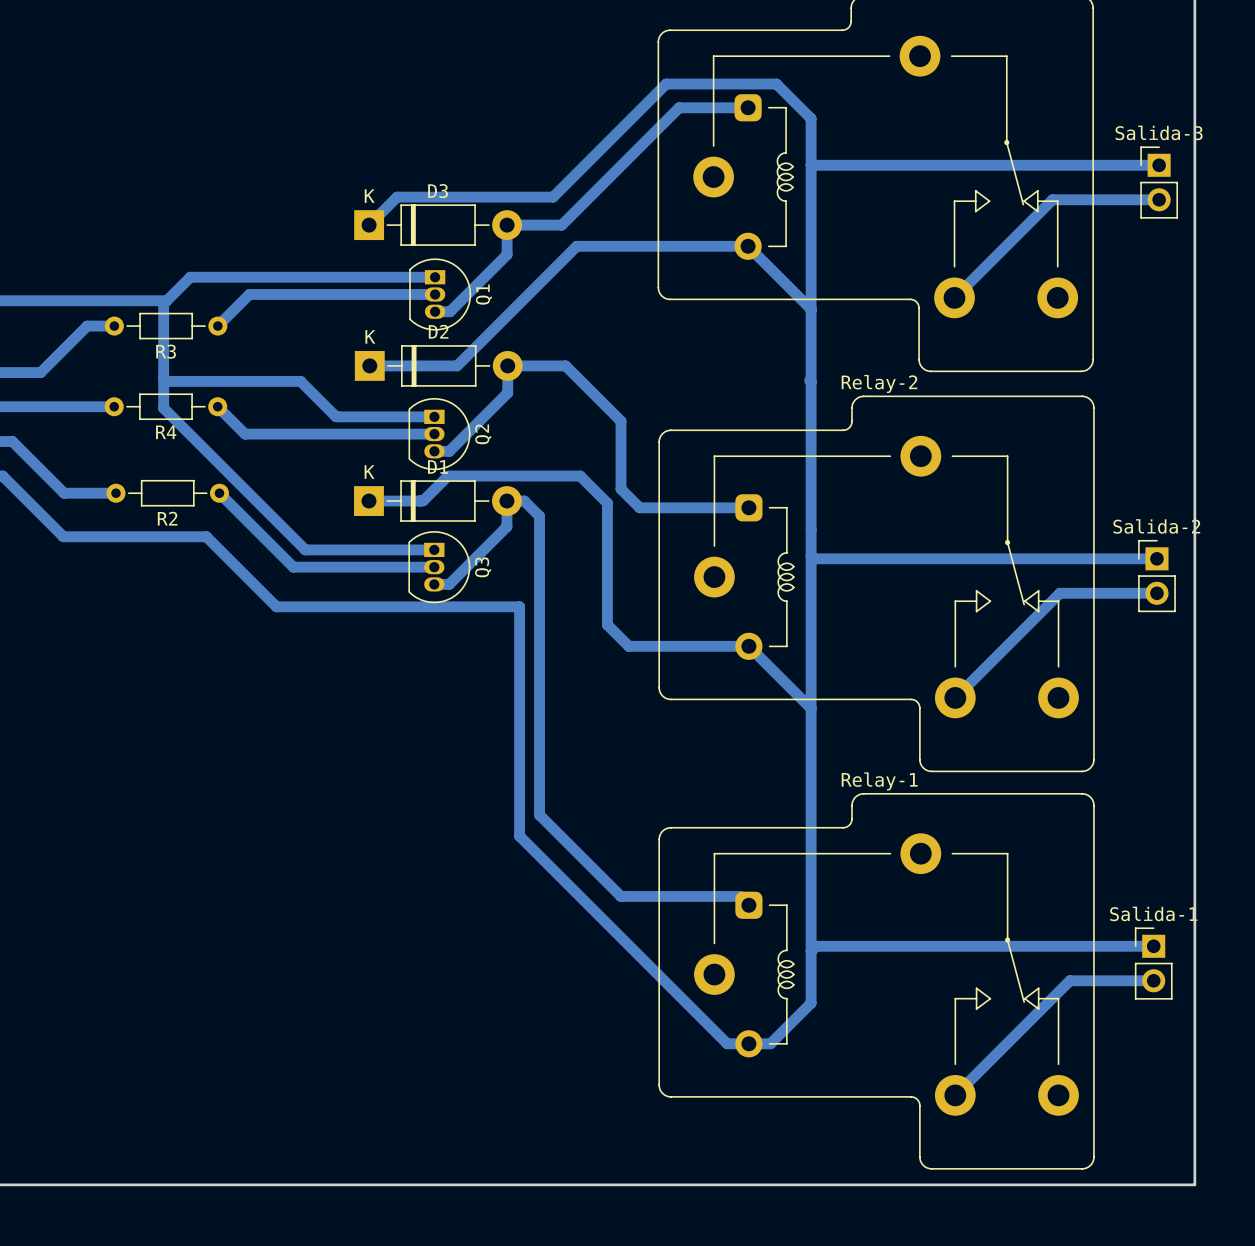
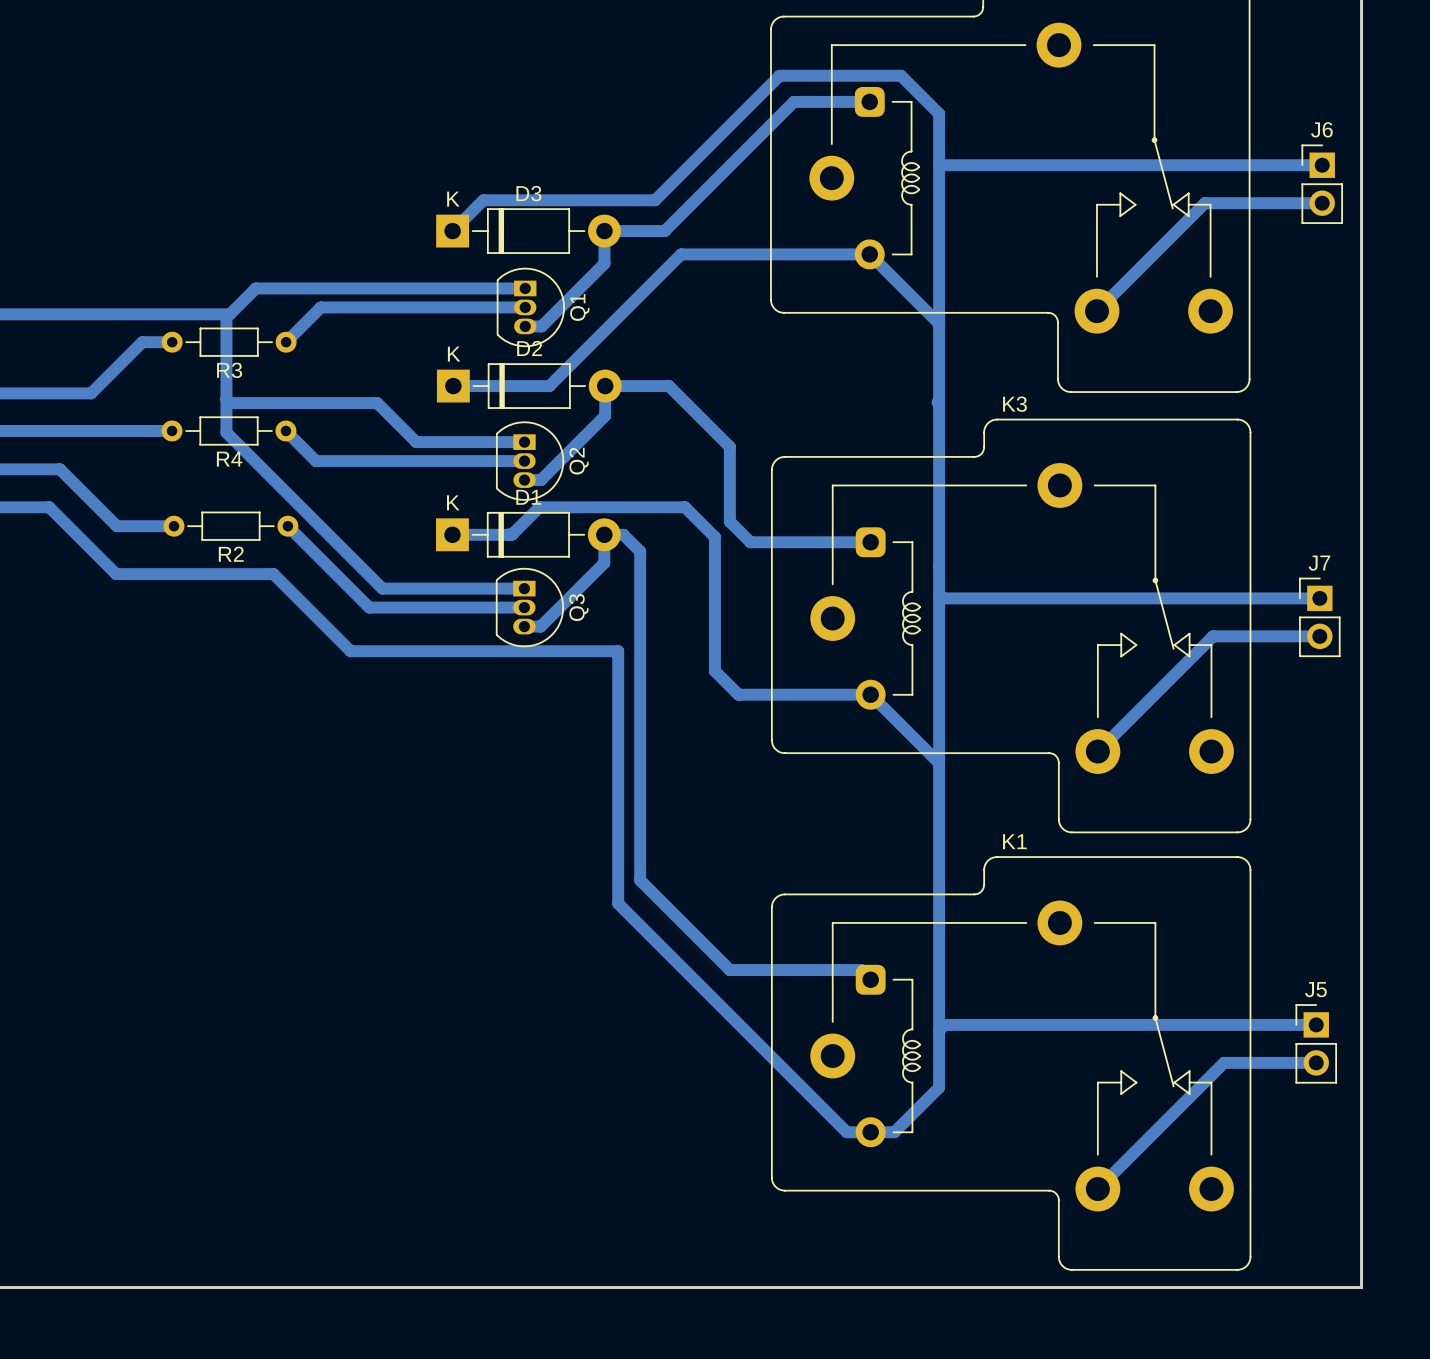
Salida-3 name: Salida-3 (1159, 132) -> J6 (1321, 129)
Relay-2 name: Relay-2 (879, 383) -> K3 (1014, 404)
Salida-2 name: Salida-2 (1156, 526) -> J7 (1319, 563)
Relay-1 name: Relay-1 (879, 781) -> K1 (1014, 841)
Salida-1 name: Salida-1 (1153, 913) -> J5 (1315, 989)

